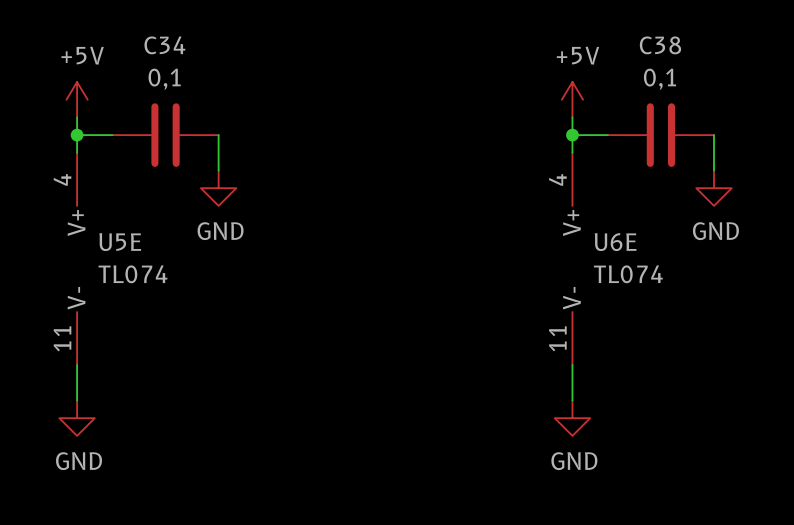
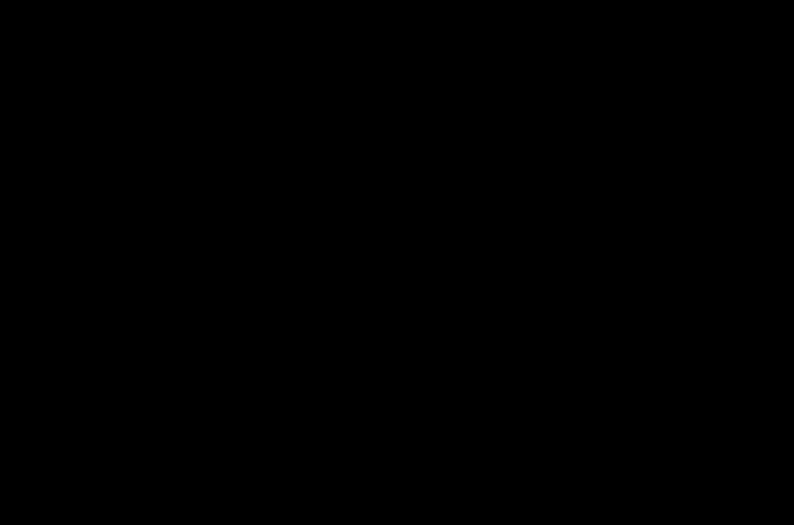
power symbol: +5V (77, 99) -> none
power symbol: +5V (572, 99) -> none
wire: (77, 117) (77, 152) -> none
wire: (572, 117) (572, 152) -> none
wire: (77, 135) (112, 135) -> none
junction: (77, 135) -> none
C34: 0,1 (165, 135) -> none
wire: (218, 135) (218, 170) -> none
wire: (572, 135) (607, 135) -> none
junction: (572, 135) -> none
C38: 0,1 (660, 135) -> none
wire: (713, 135) (713, 170) -> none
power symbol: GND (218, 188) -> none
power symbol: GND (713, 188) -> none
U5E: TL074 (77, 258) -> none
U6E: TL074 (572, 258) -> none
wire: (77, 365) (77, 400) -> none
wire: (572, 365) (572, 400) -> none
power symbol: GND (77, 418) -> none
power symbol: GND (572, 418) -> none

